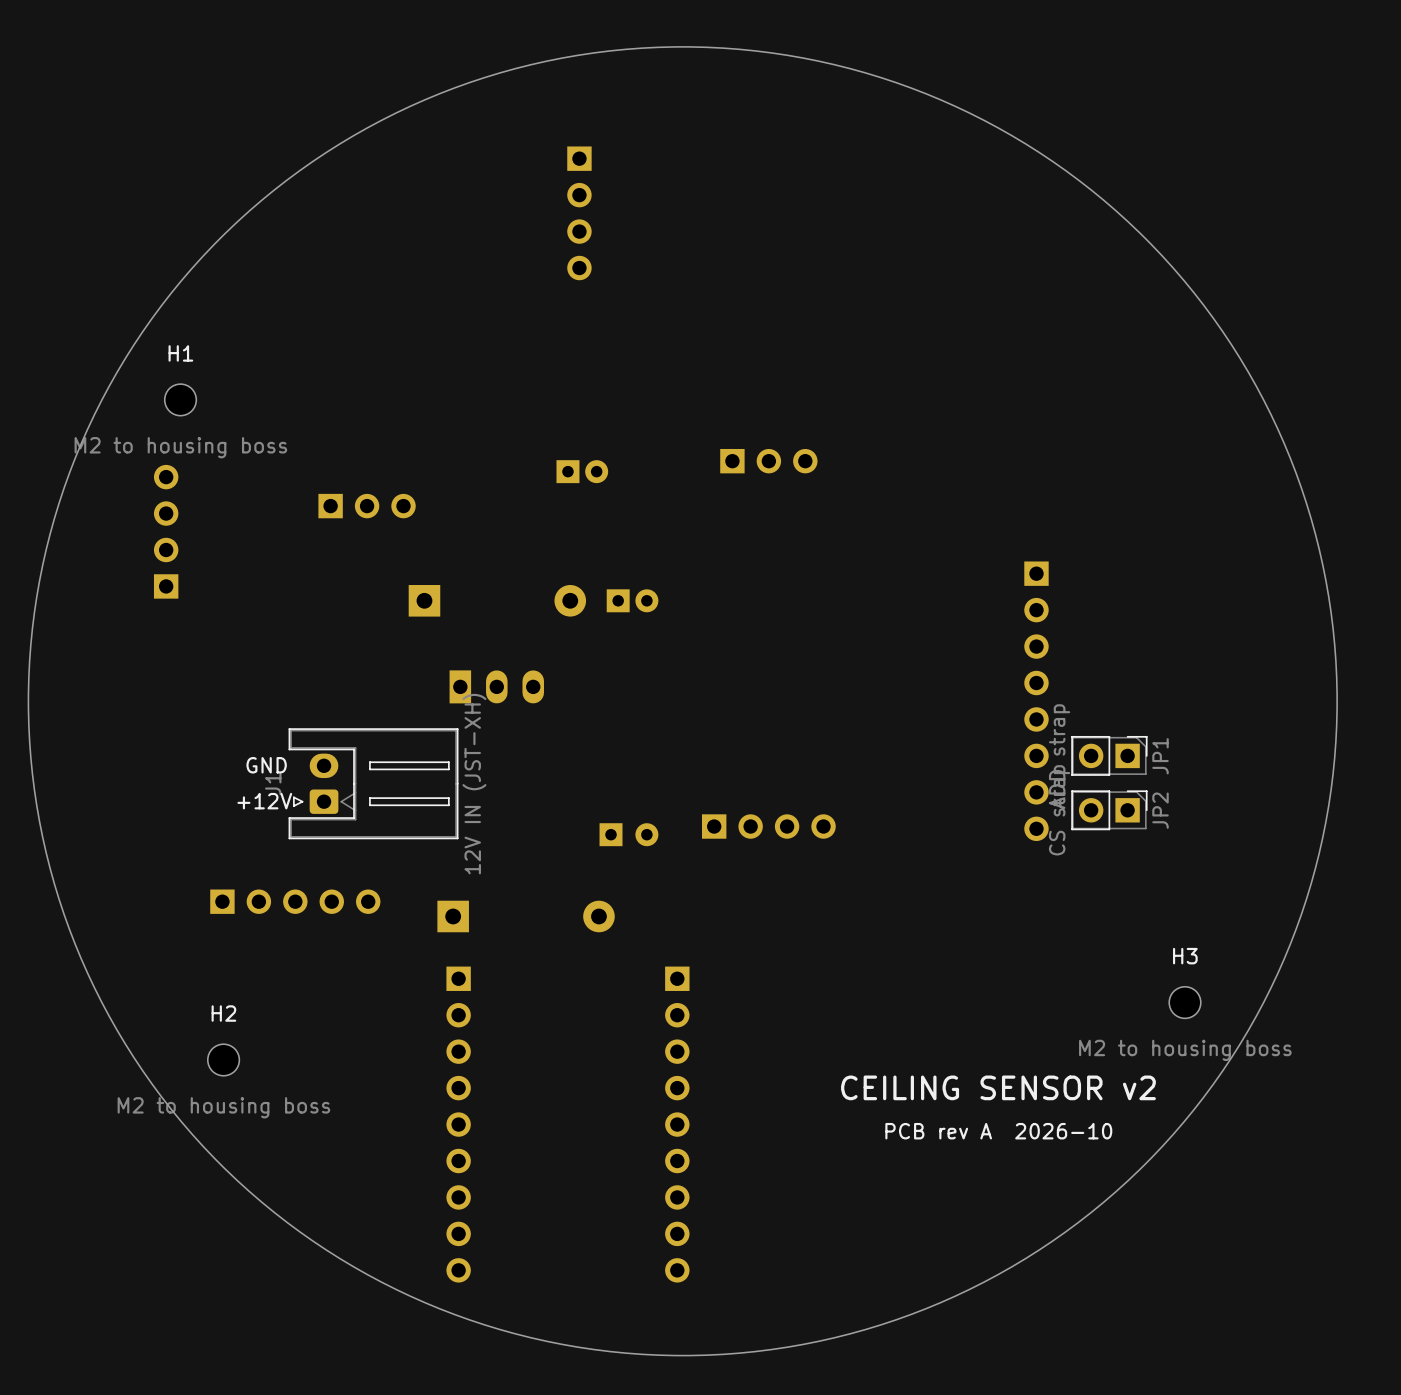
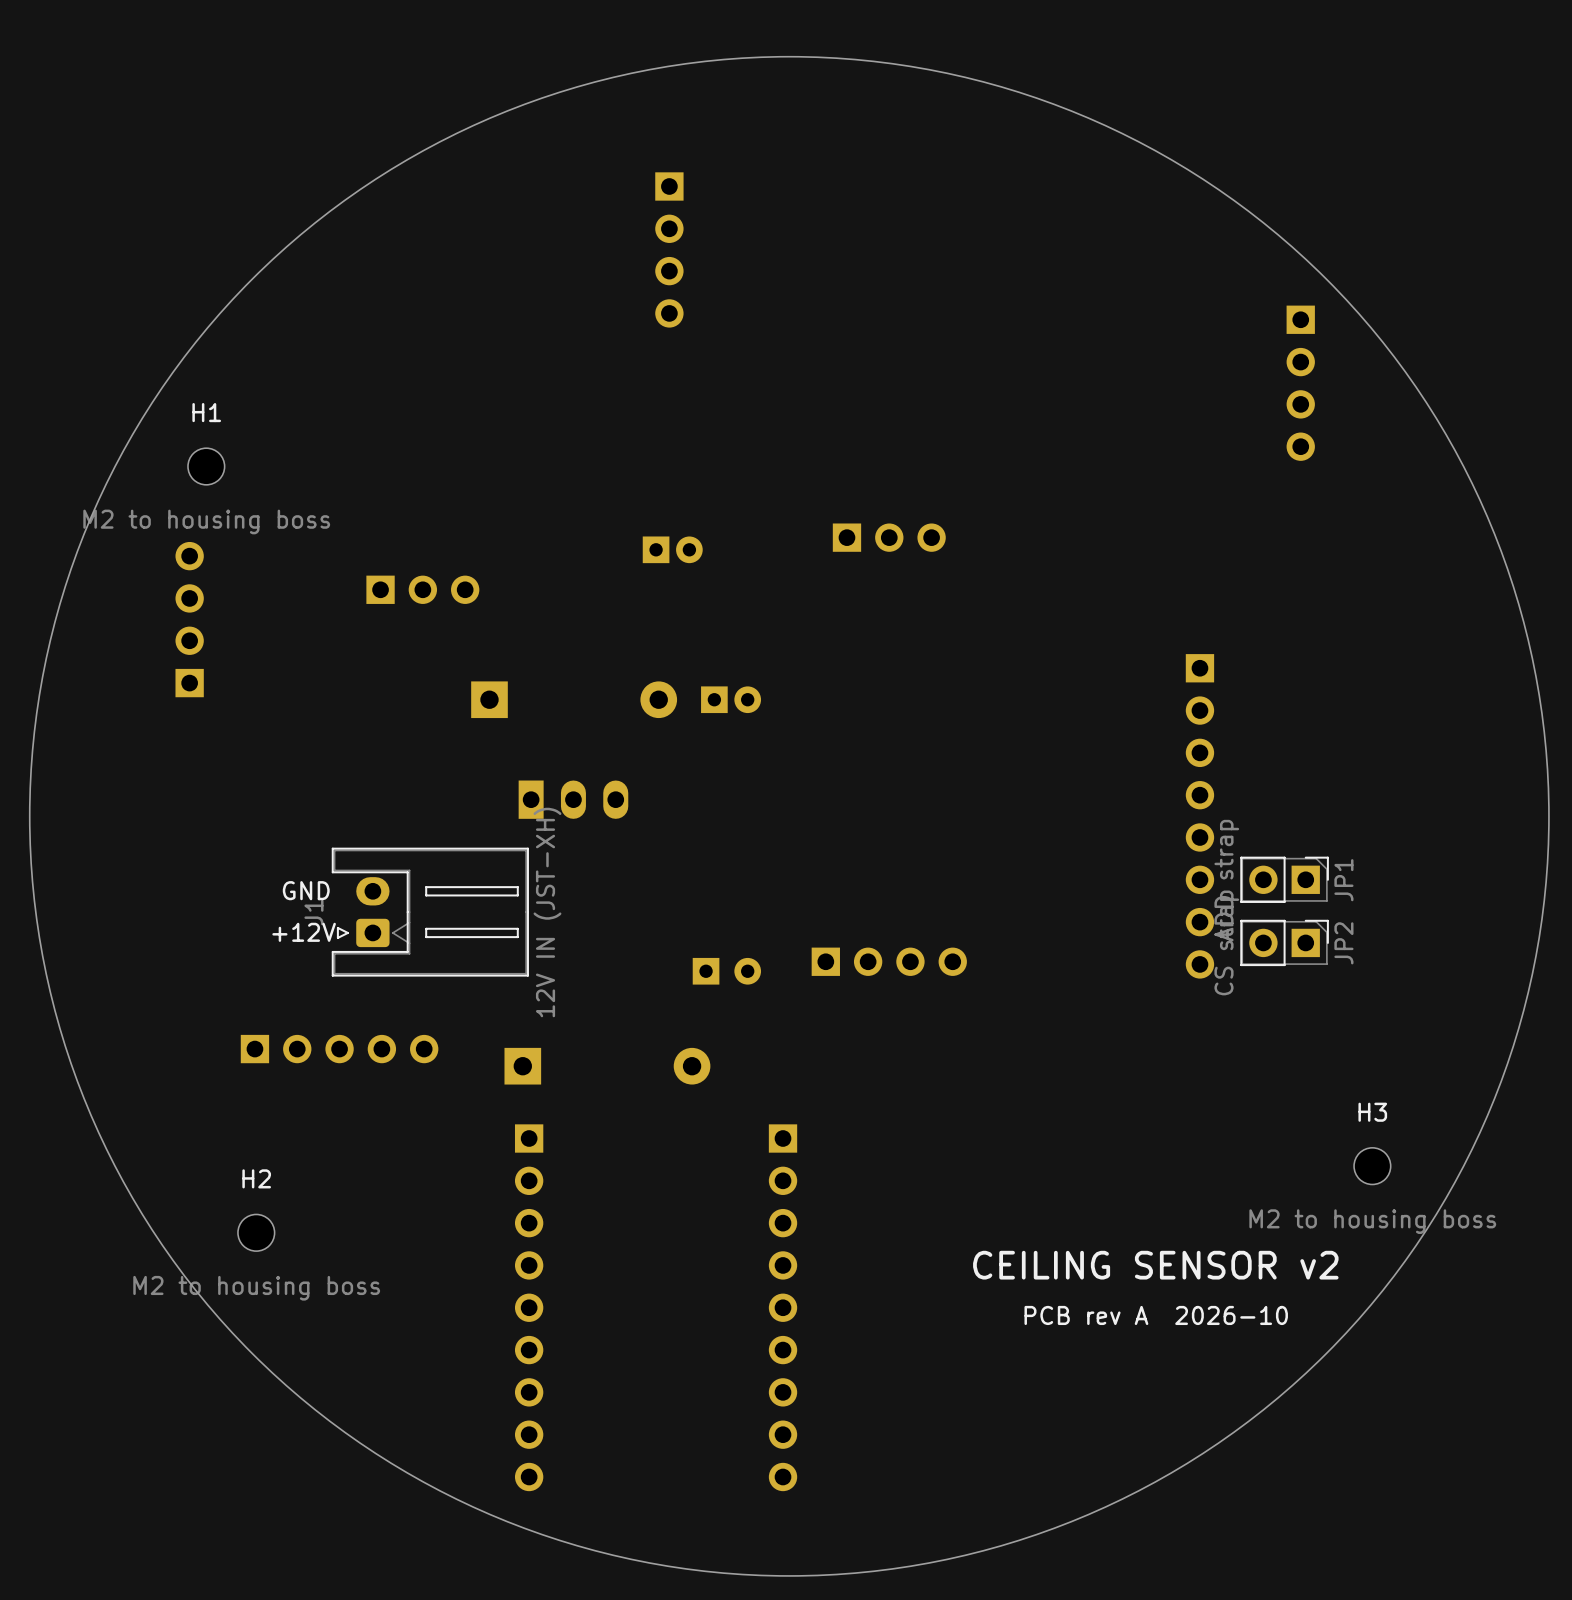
part: none -> (1300, 383)

